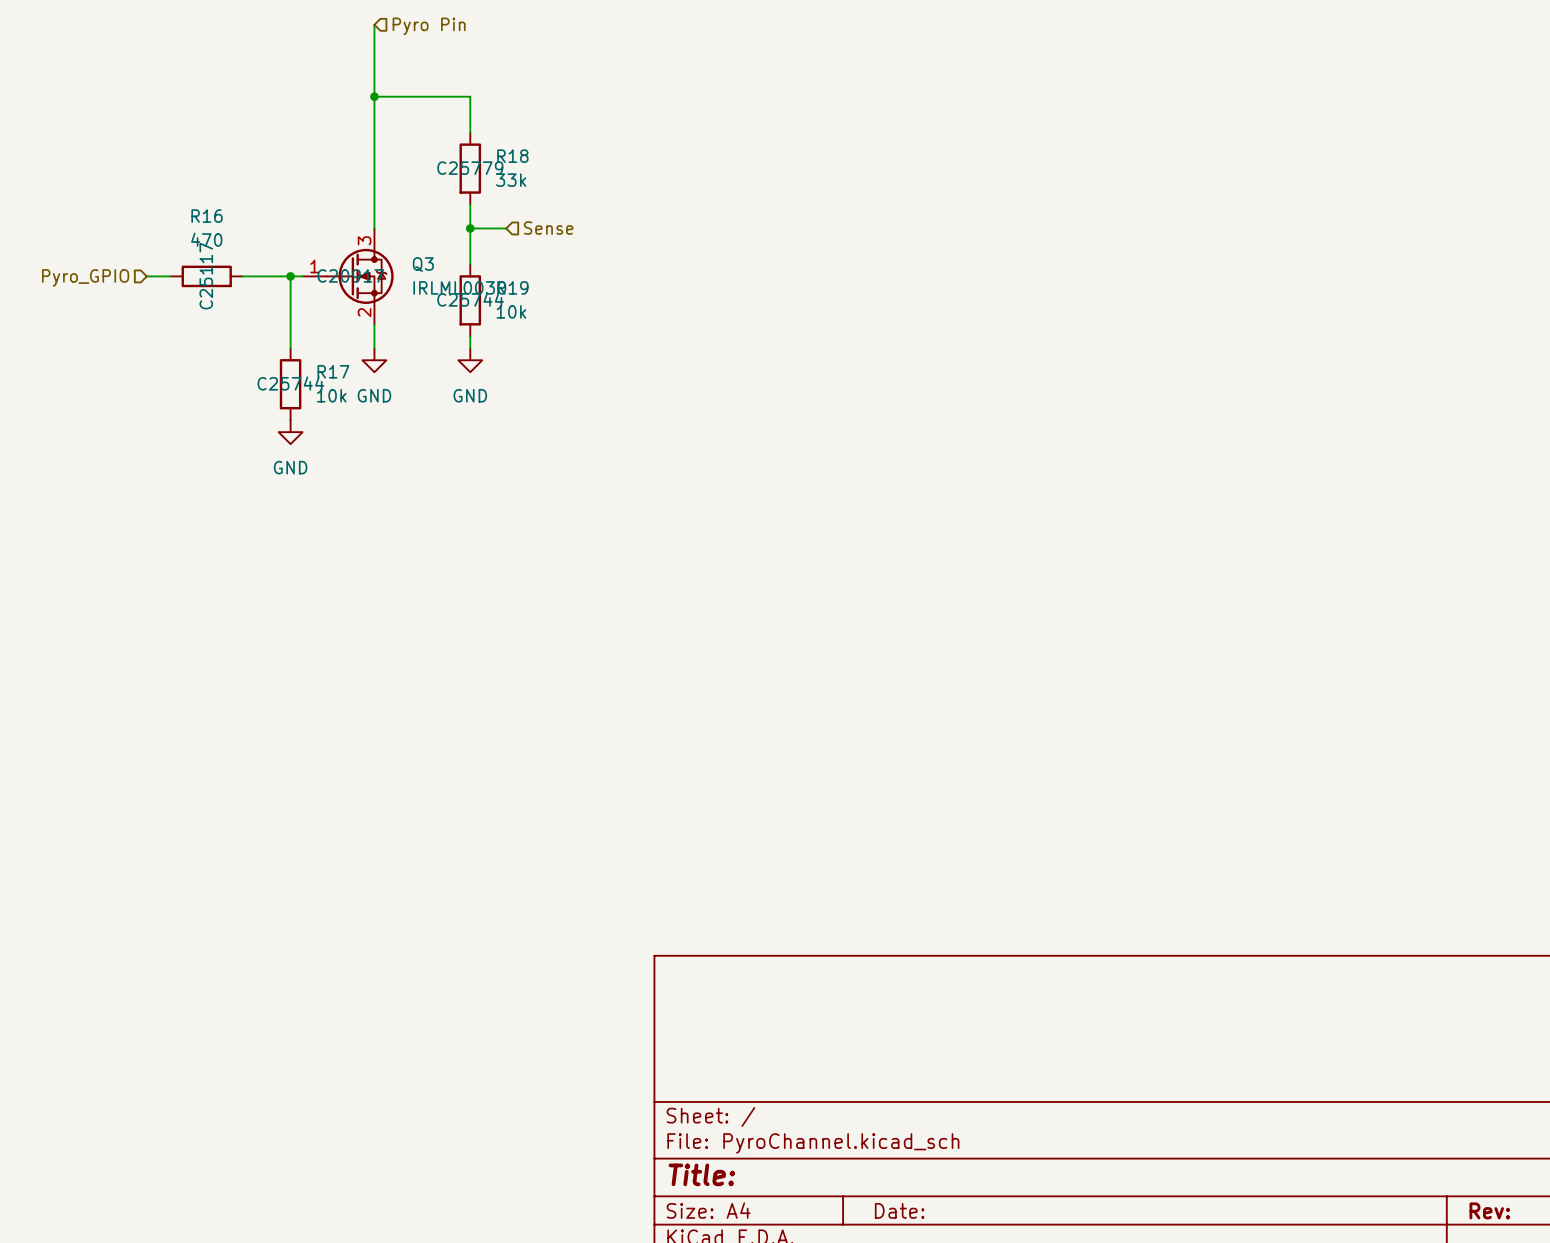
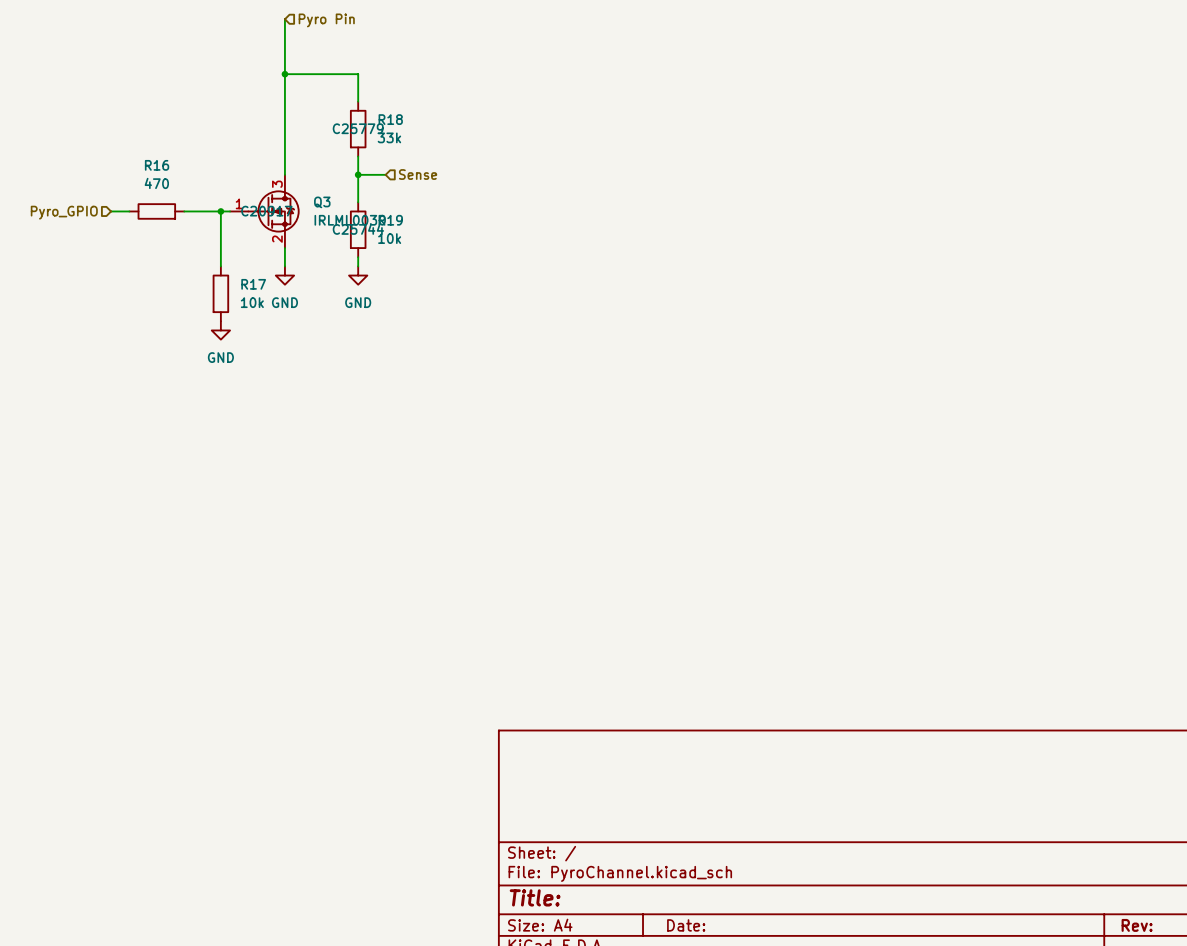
R16 text: C25117 (206, 276) -> none
R17 text: C25744 (290, 383) -> none

